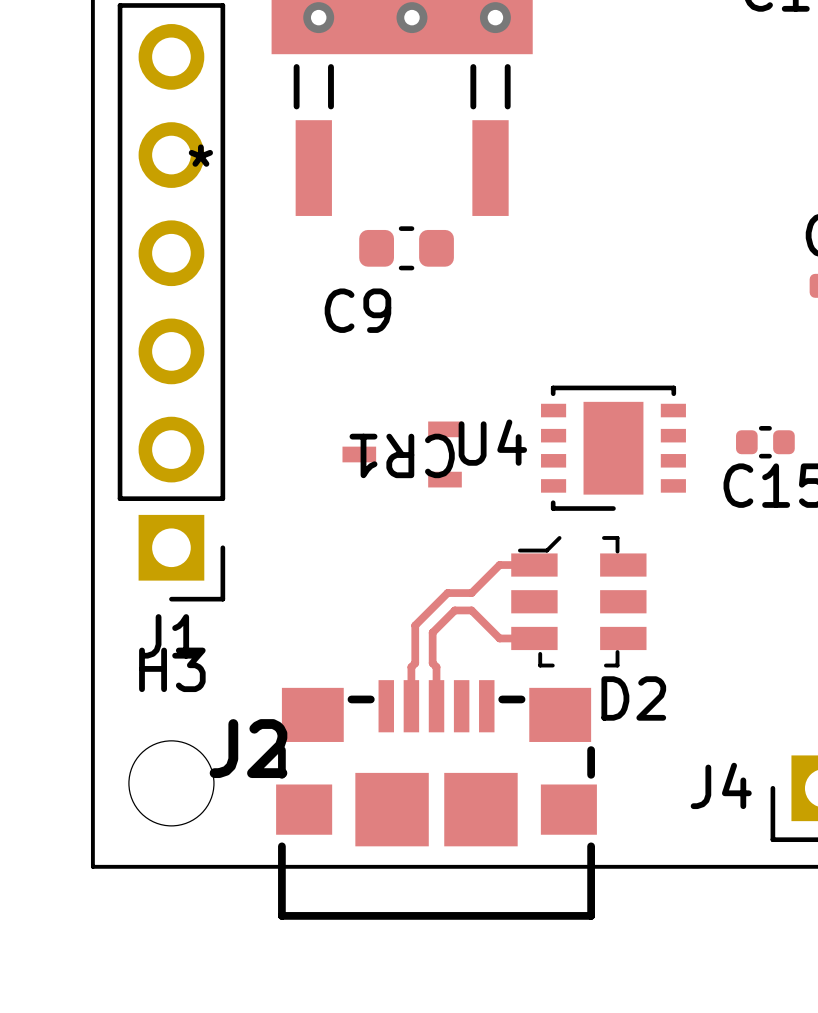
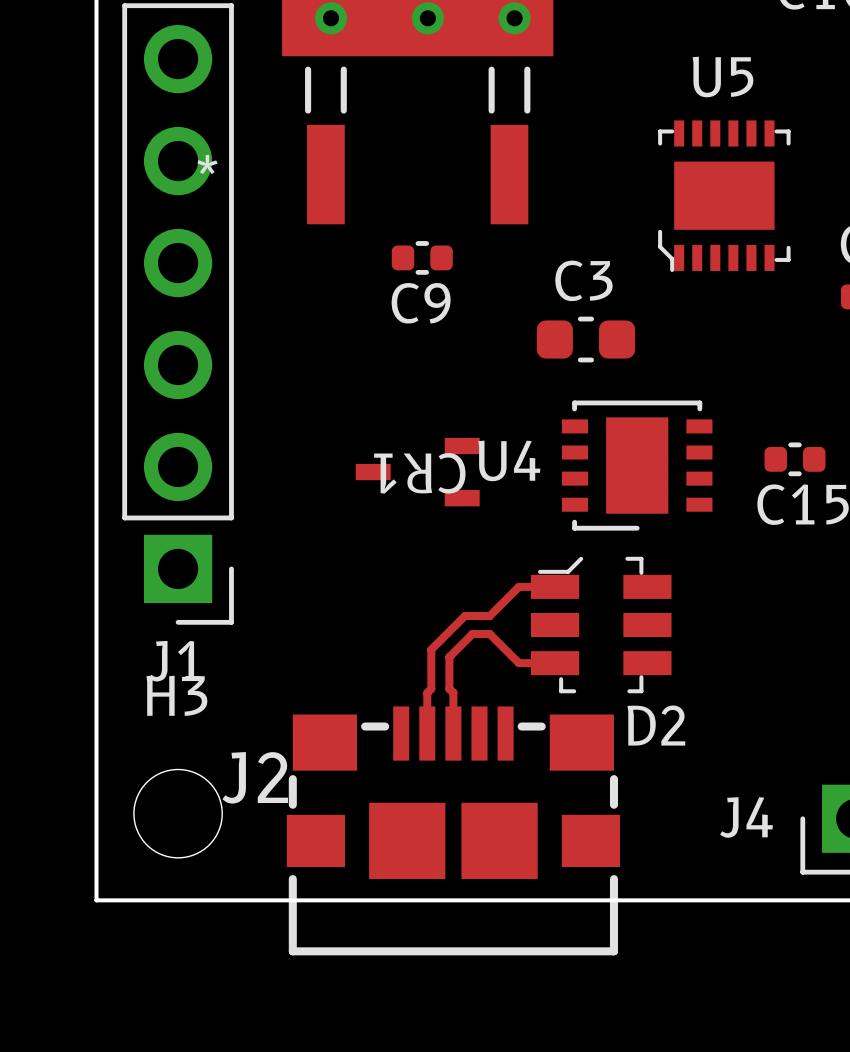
U5: none -> (724, 196)
C9 footprint: [359, 226, 454, 271] -> [391, 241, 453, 275]
C9 name position: C9 (357, 310) -> C9 (421, 303)
C3: none -> (585, 339)

